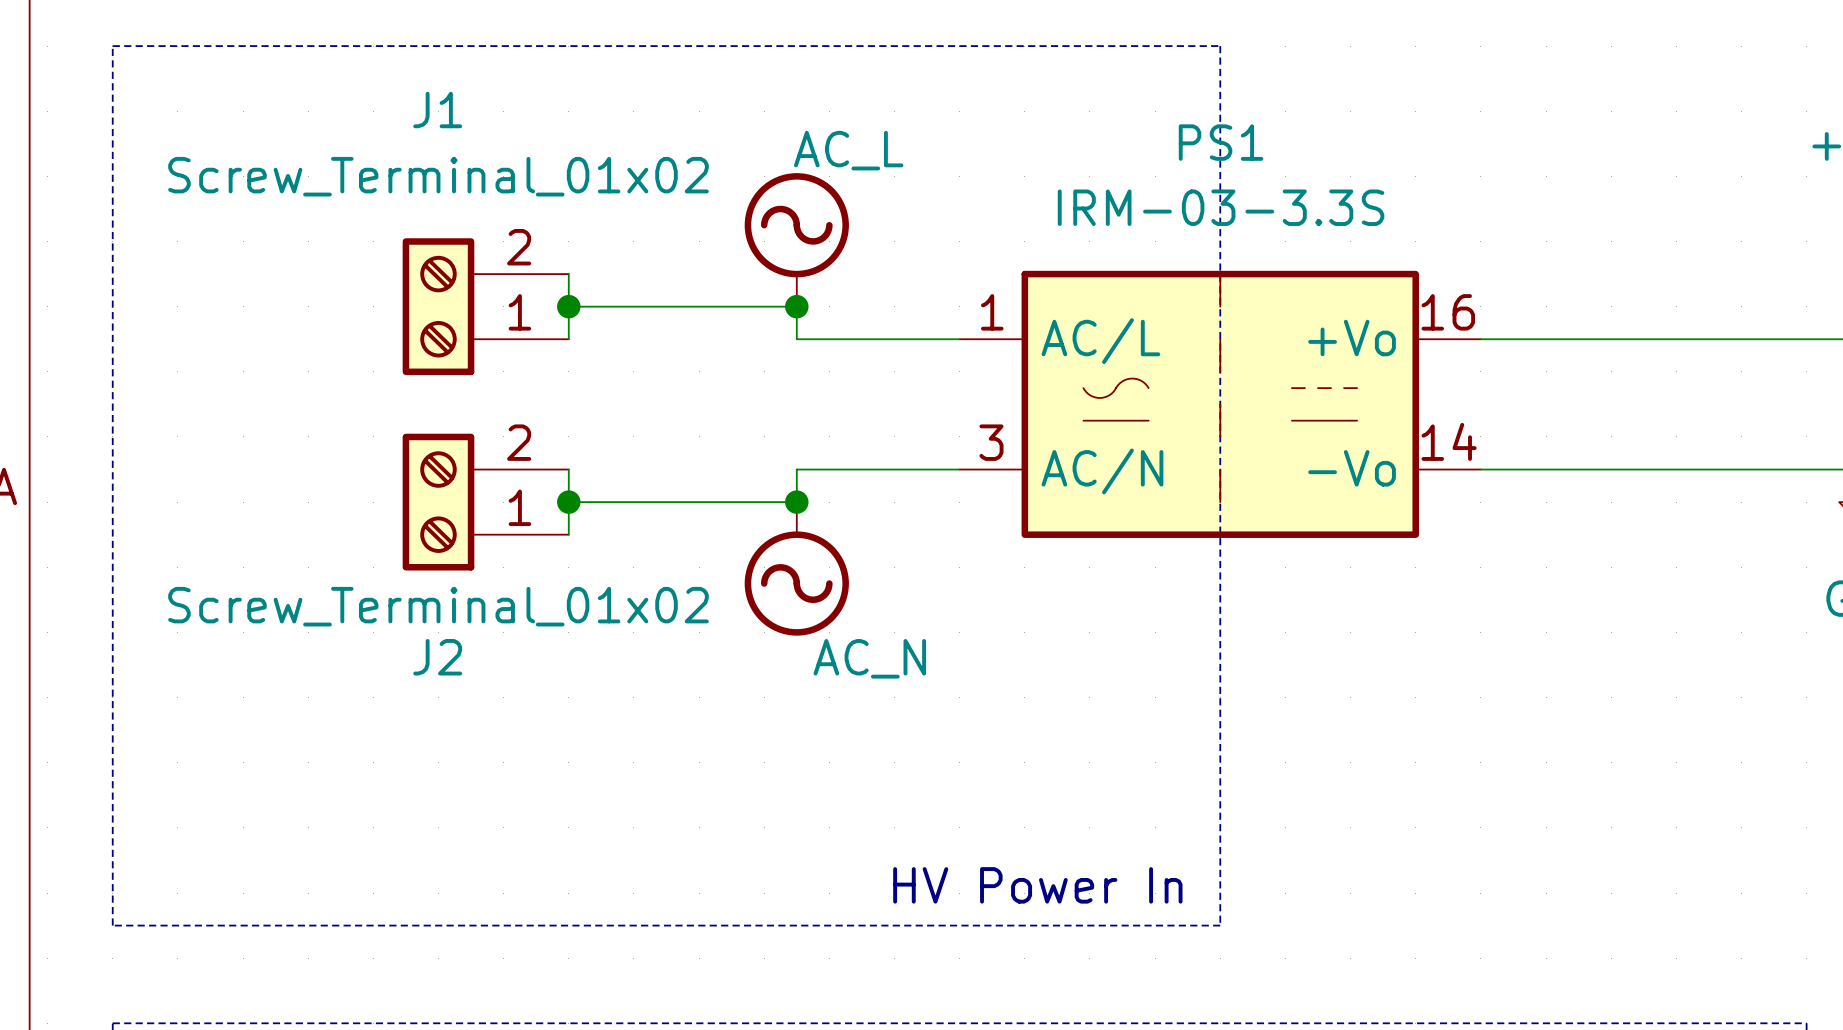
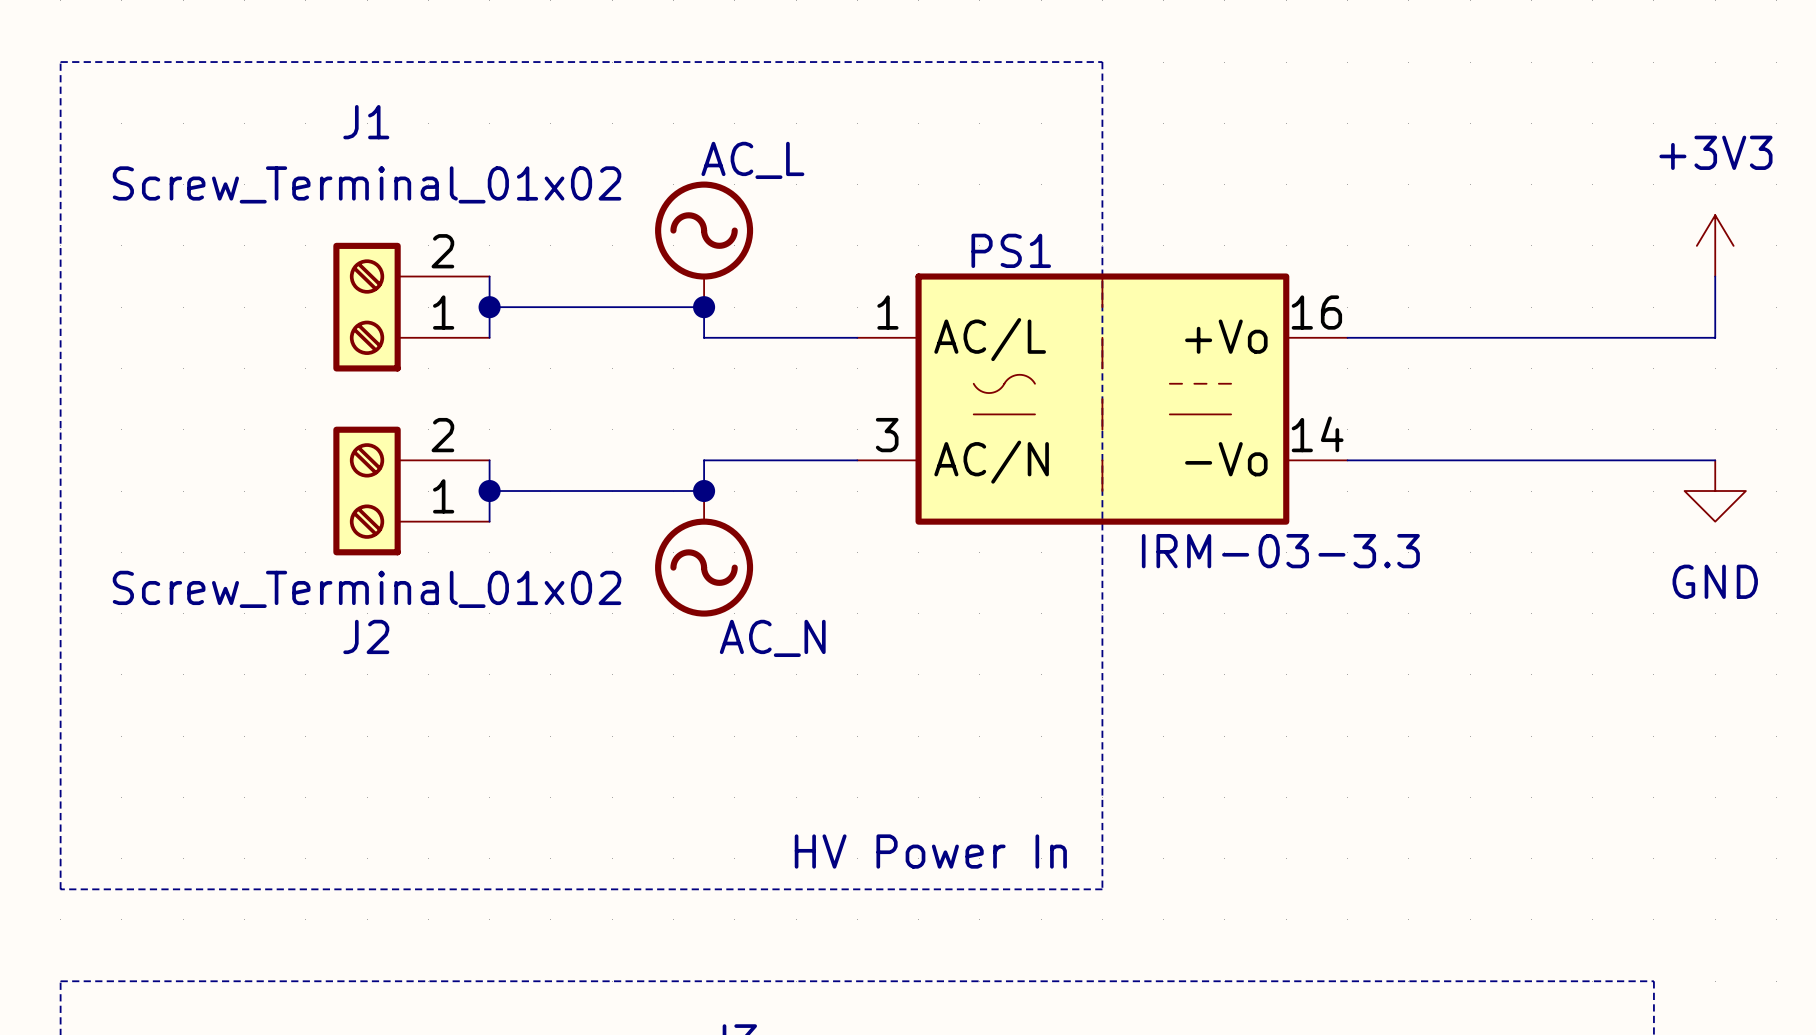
PS1 name position: PS1 (1221, 142) -> PS1 (1011, 250)
PS1 value: IRM-03-3.3S (1221, 207) -> IRM-03-3.3 (1280, 551)

